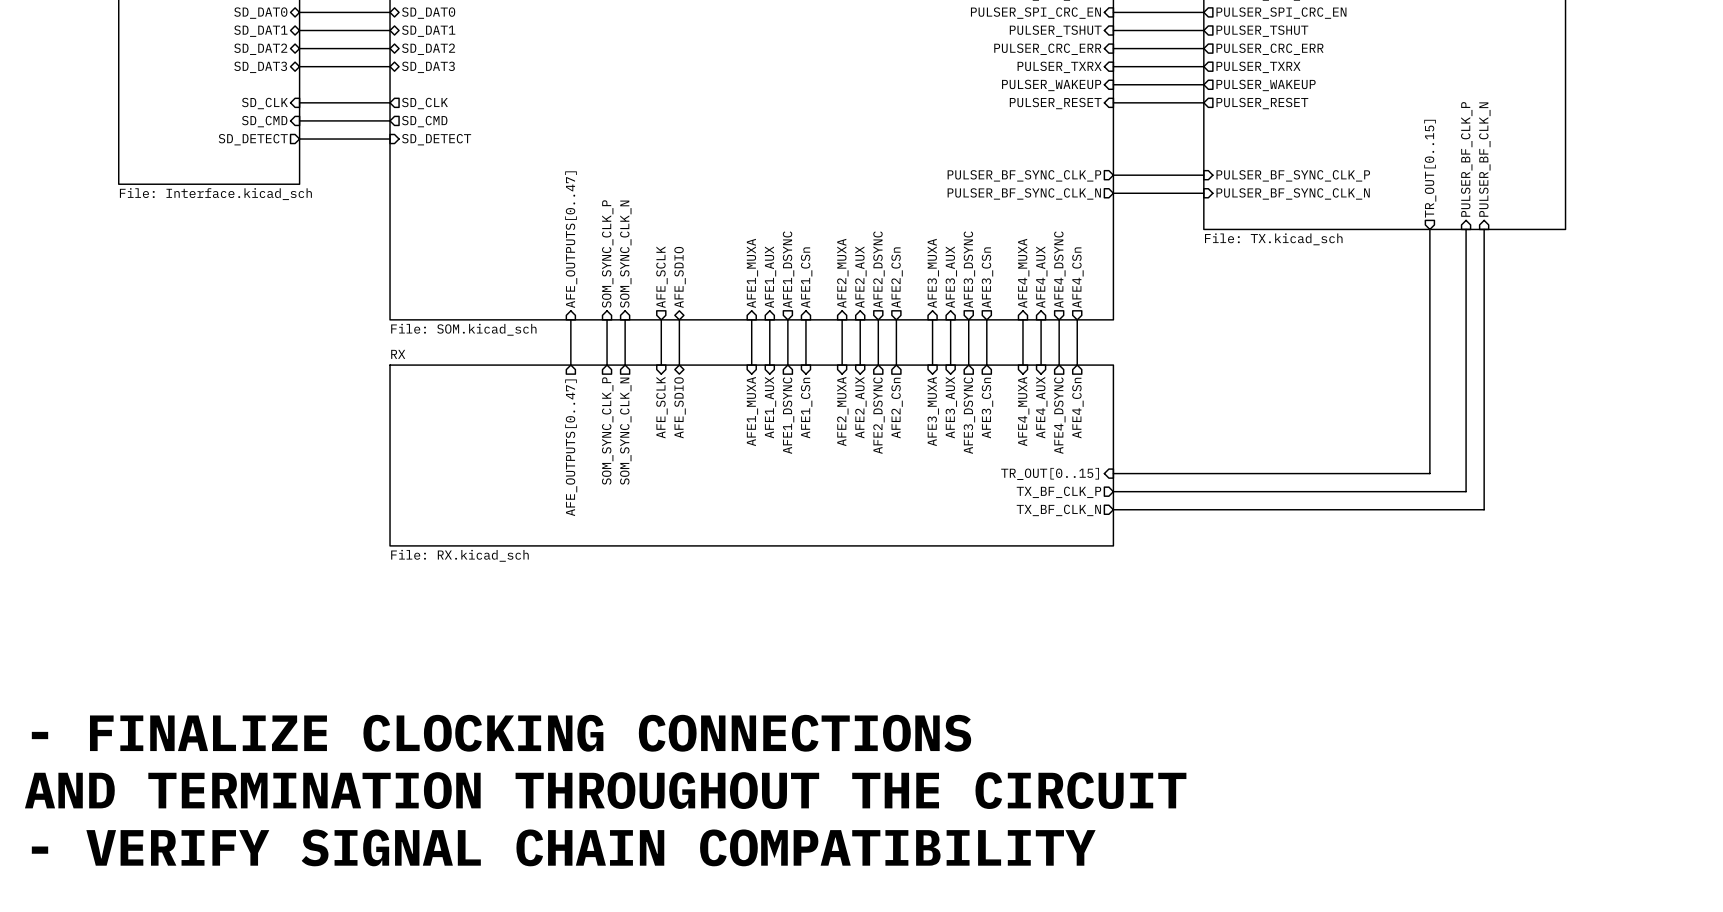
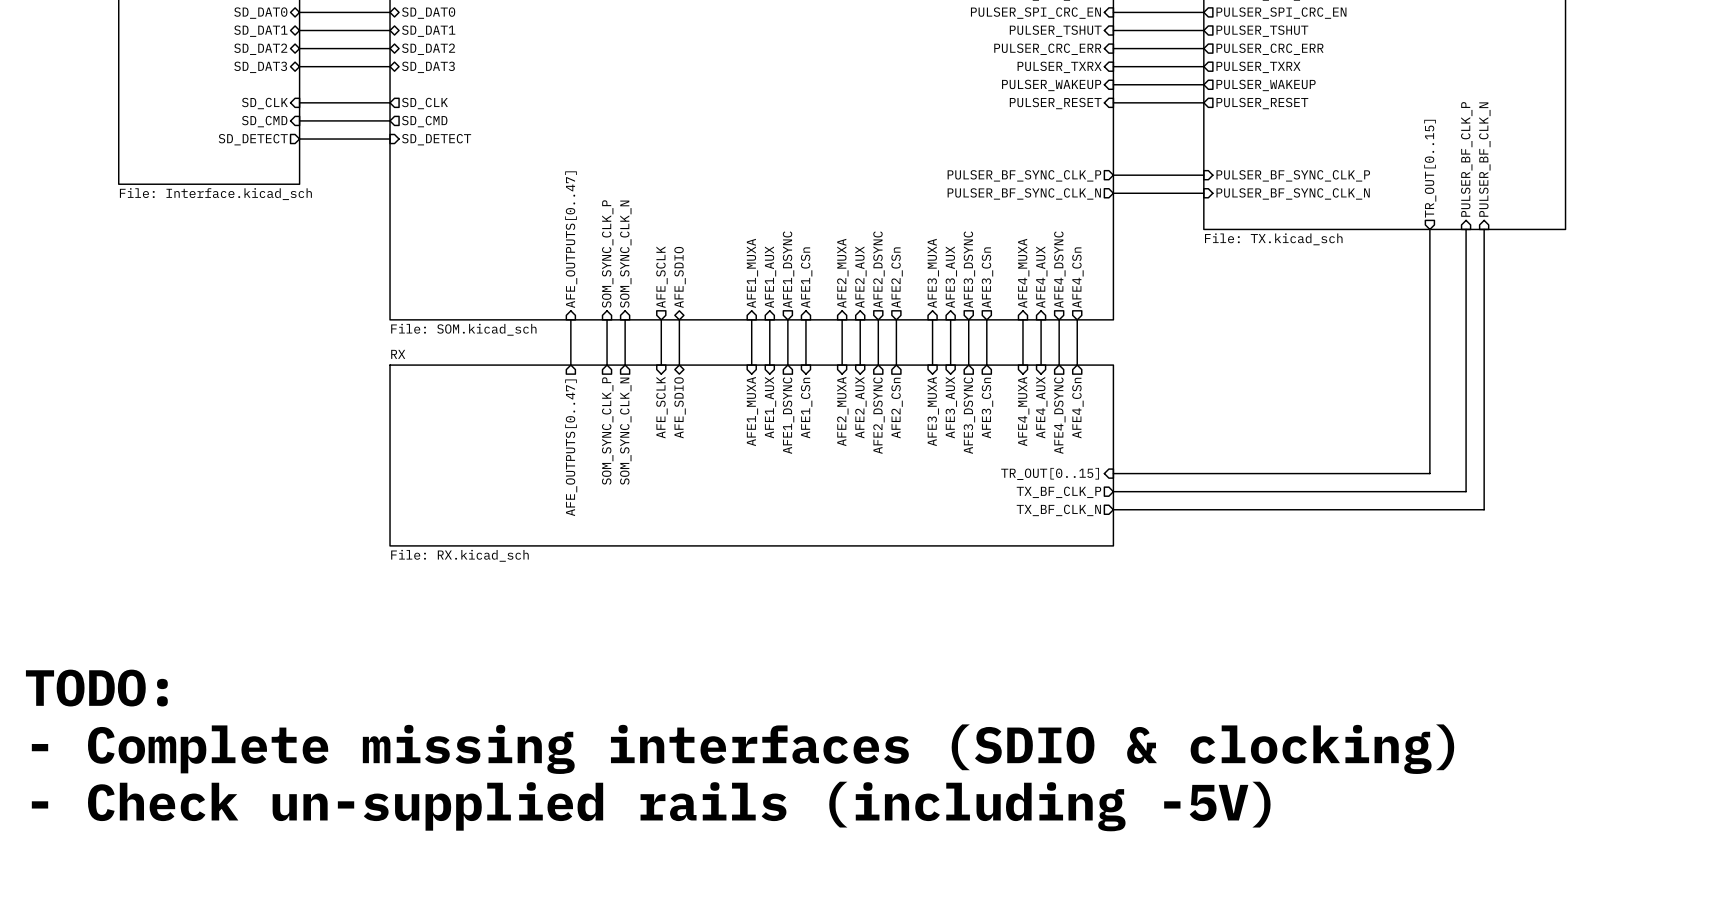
text: none -> TODO: (96, 688)
text: - FINALIZE CLOCKING CONNECTIONS (501, 733) -> none
text: none -> - Complete missing interfaces (SDIO & clocking) (743, 749)
text: AND TERMINATION THROUGHOUT THE CIRCUIT (605, 790) -> none
text: none -> - Check un-supplied rails (including -5V) (651, 806)
text: - VERIFY SIGNAL CHAIN COMPATIBILITY (563, 847) -> none

